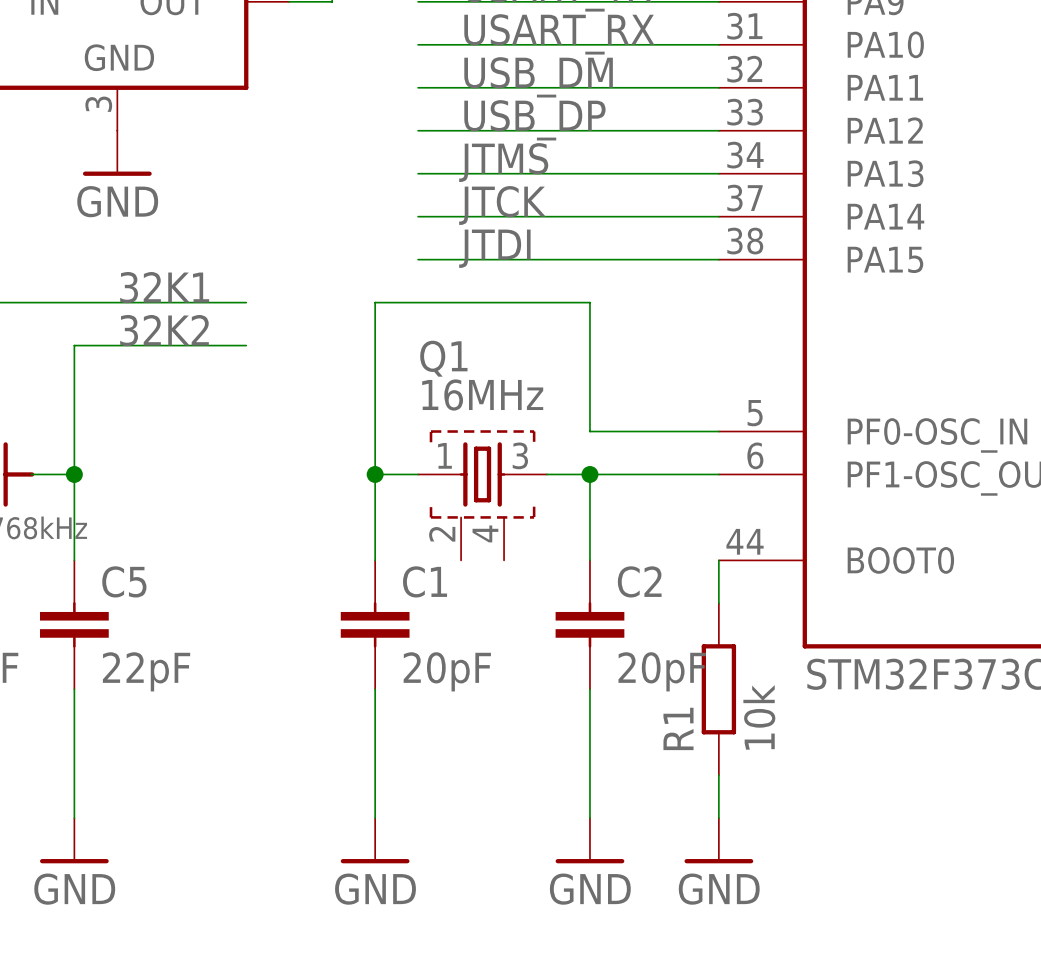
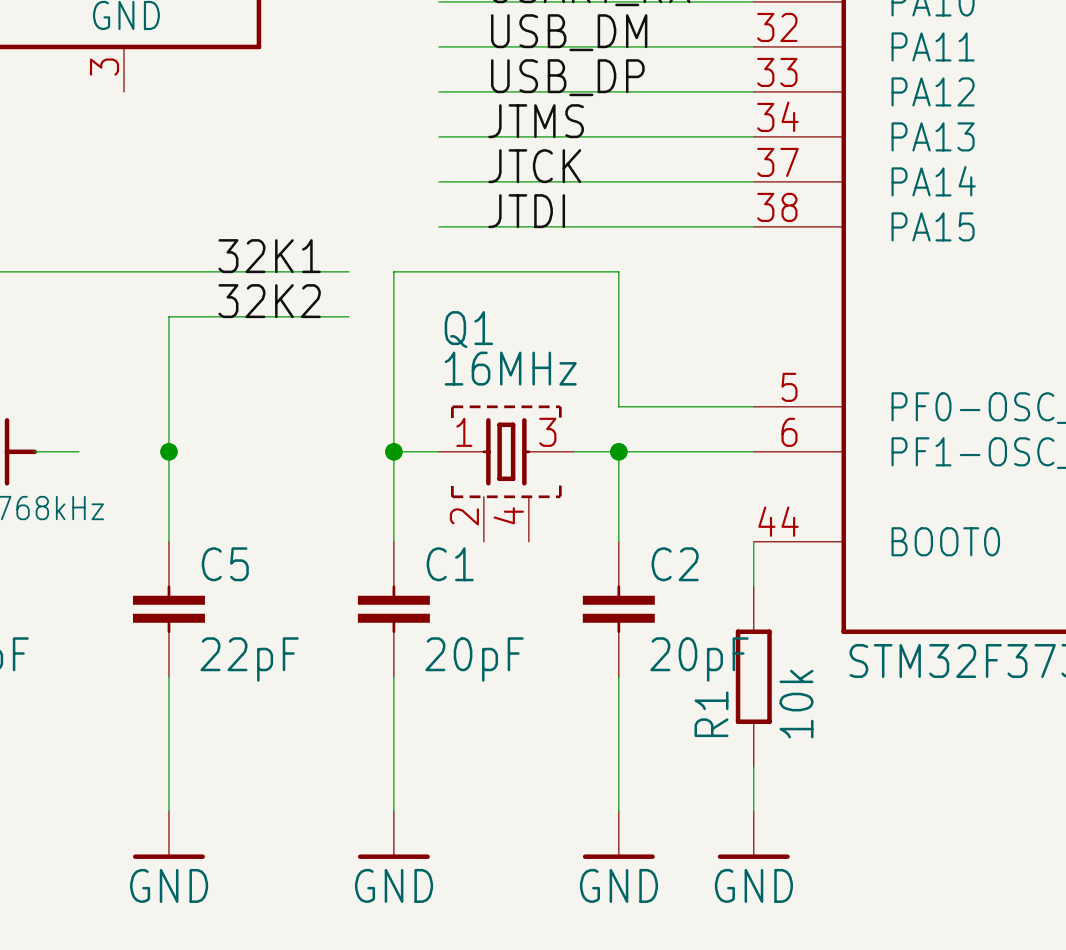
power symbol: GND (117, 153) -> none
label position: 32K1 (164, 287) -> 32K1 (269, 256)
wire: none -> (258, 271) (348, 271)
label position: 32K2 (164, 330) -> 32K2 (269, 301)
wire: (160, 345) (74, 345) (74, 560) -> (168, 316) (168, 541)
wire: none -> (258, 316) (348, 316)
junction: (74, 474) -> none
junction: none -> (168, 451)
C5 position: (74, 624) -> (168, 609)
wire: (74, 689) (74, 818) -> (168, 676) (168, 811)
power symbol position: GND (74, 840) -> GND (168, 835)

